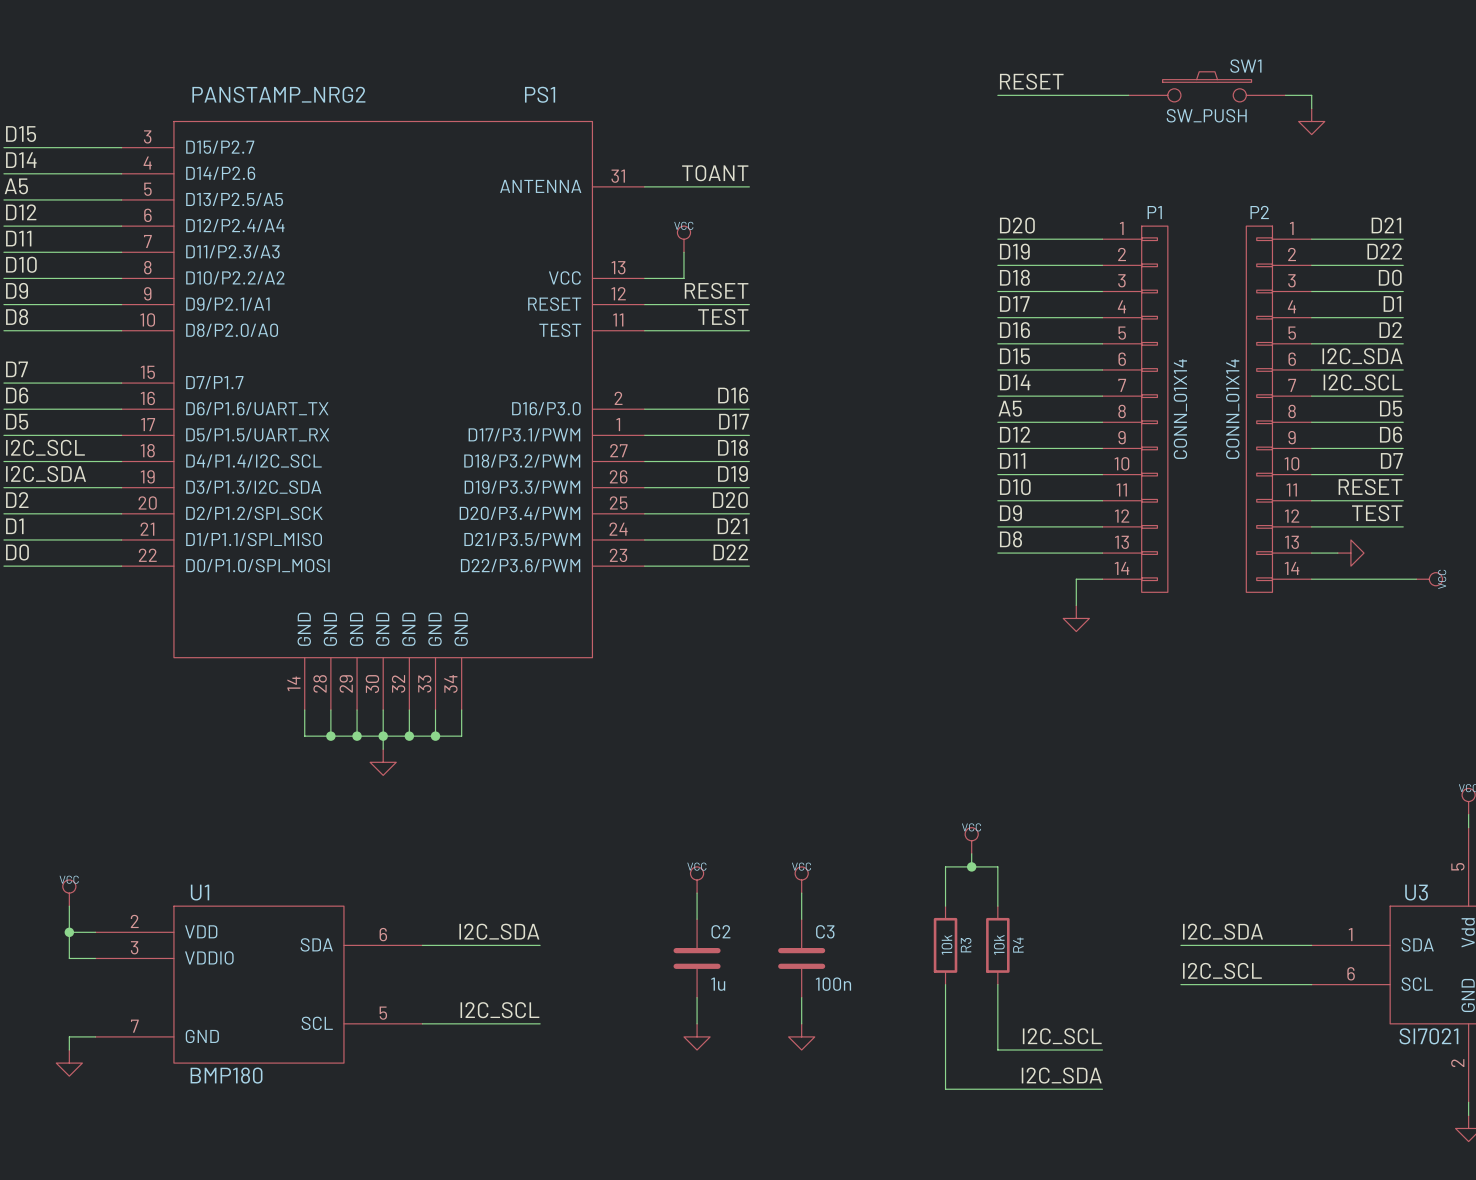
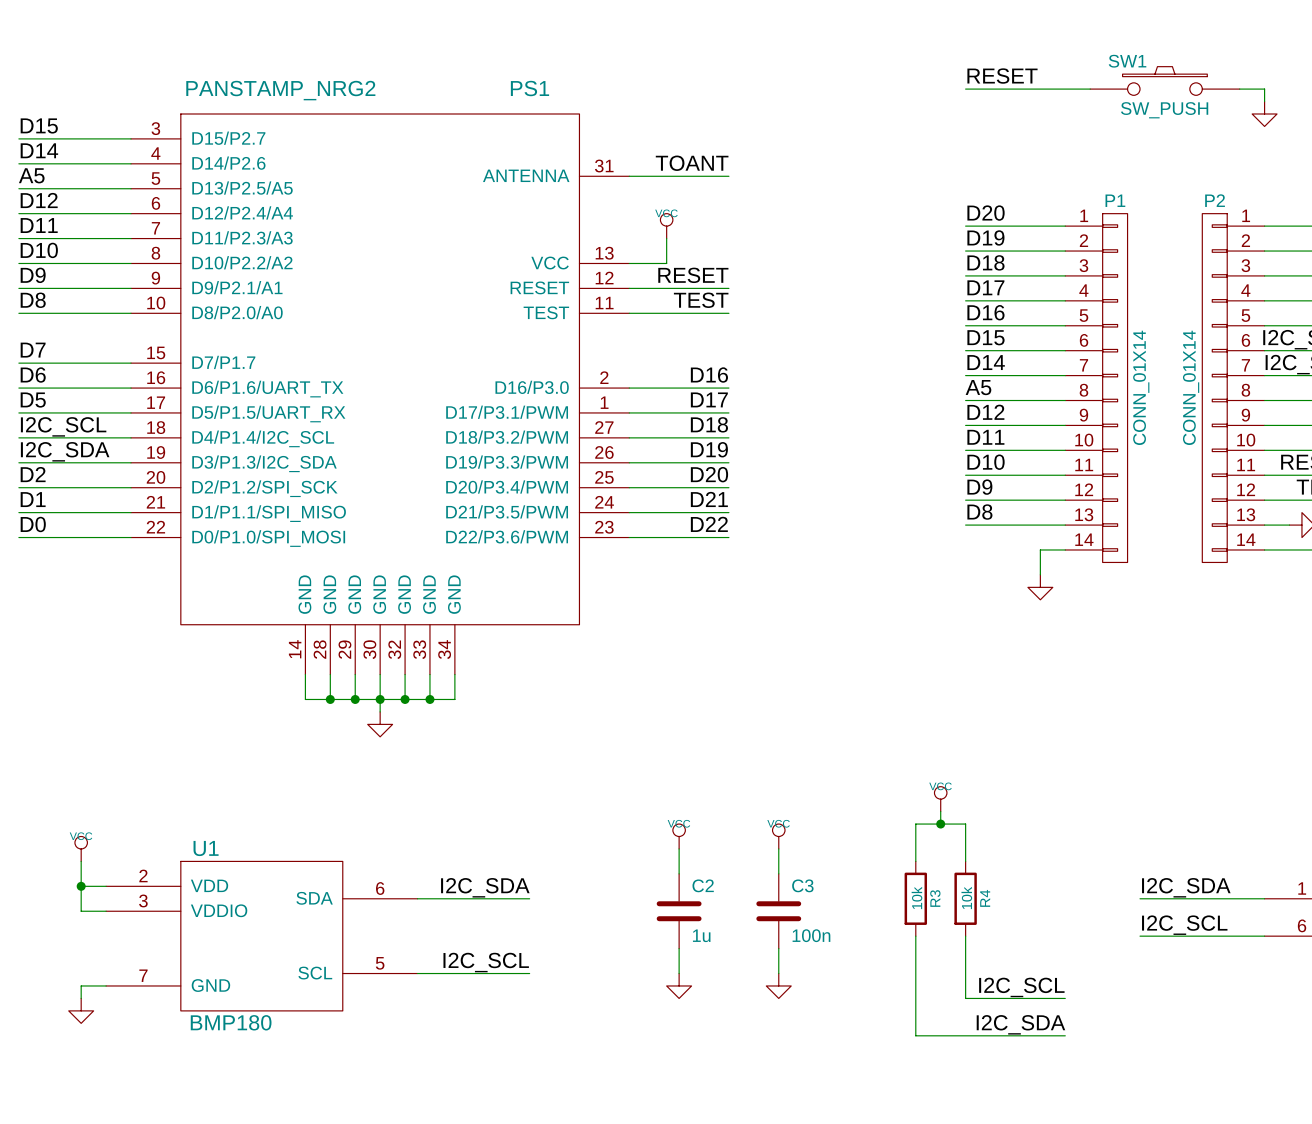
SW1 name position: SW1 (1245, 66) -> SW1 (1127, 61)

